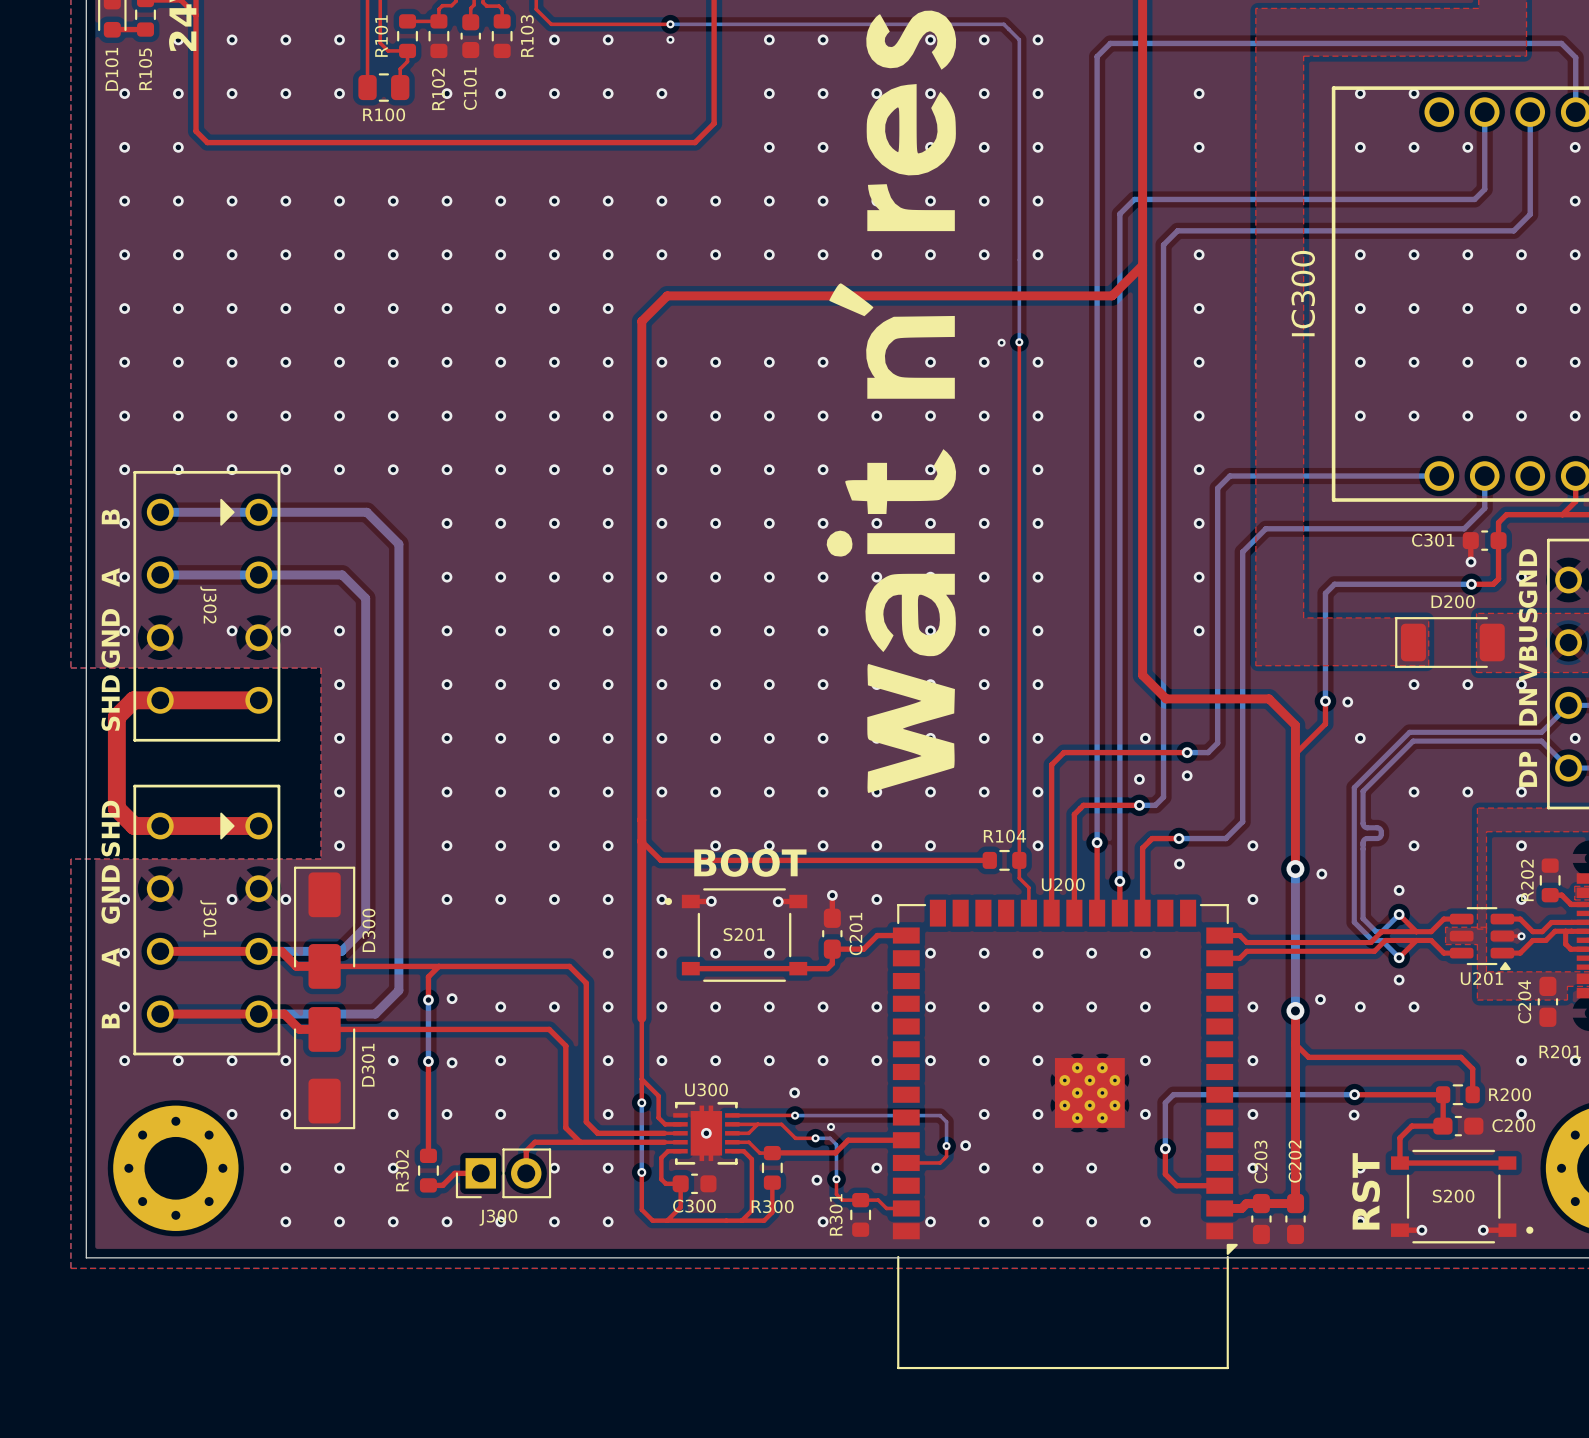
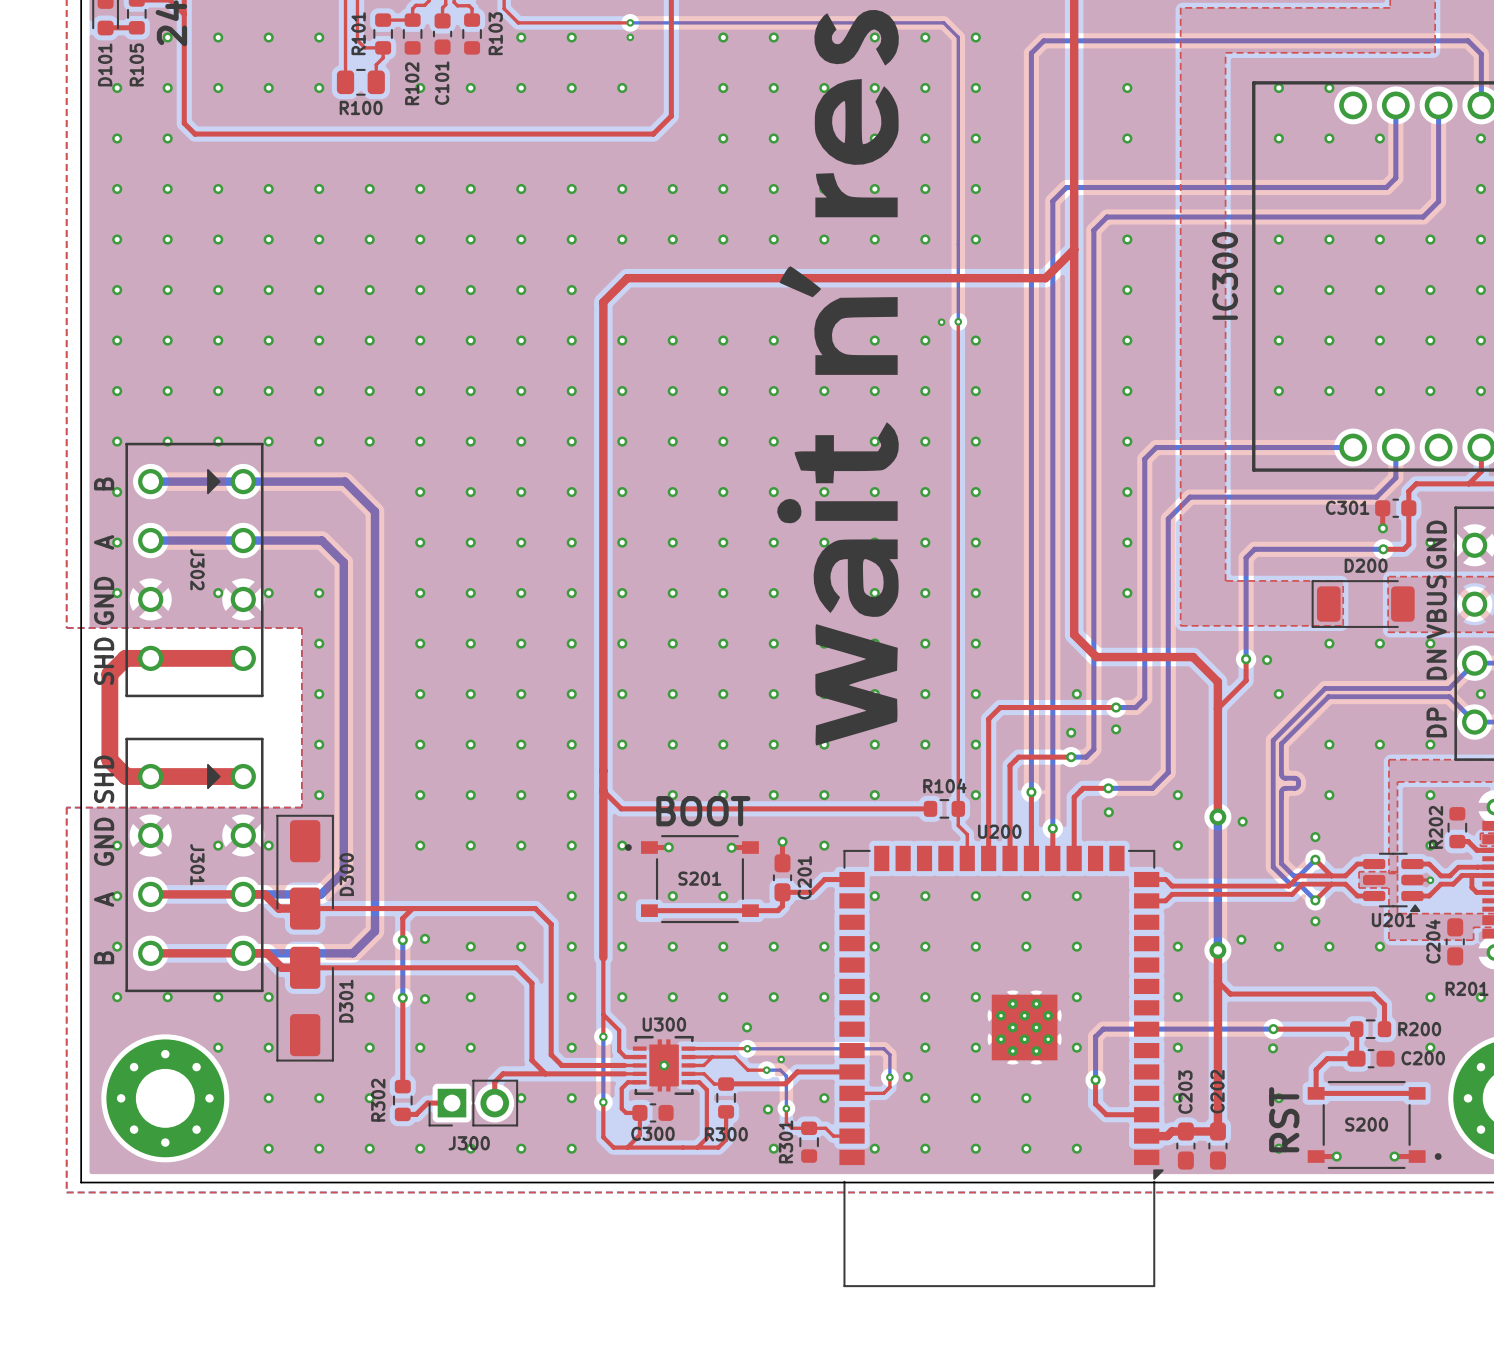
via: none -> (1379, 946)

